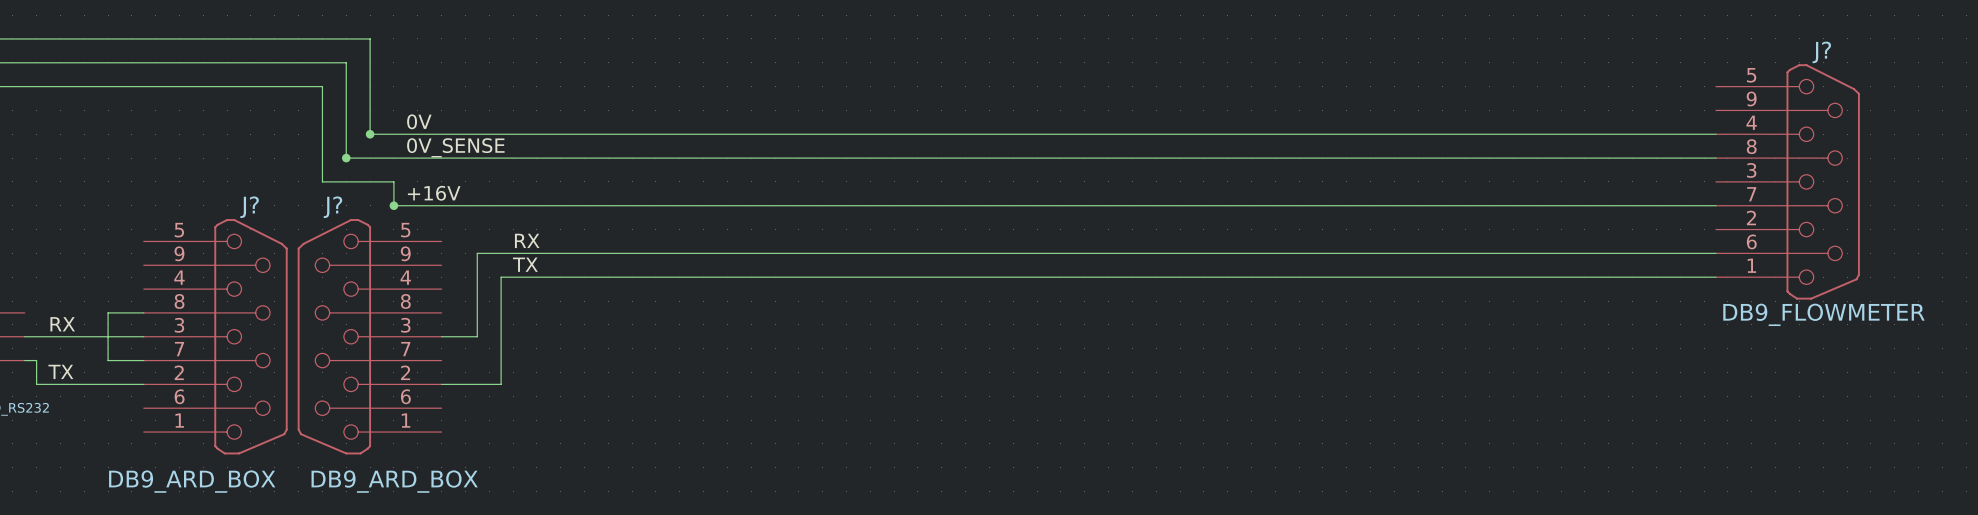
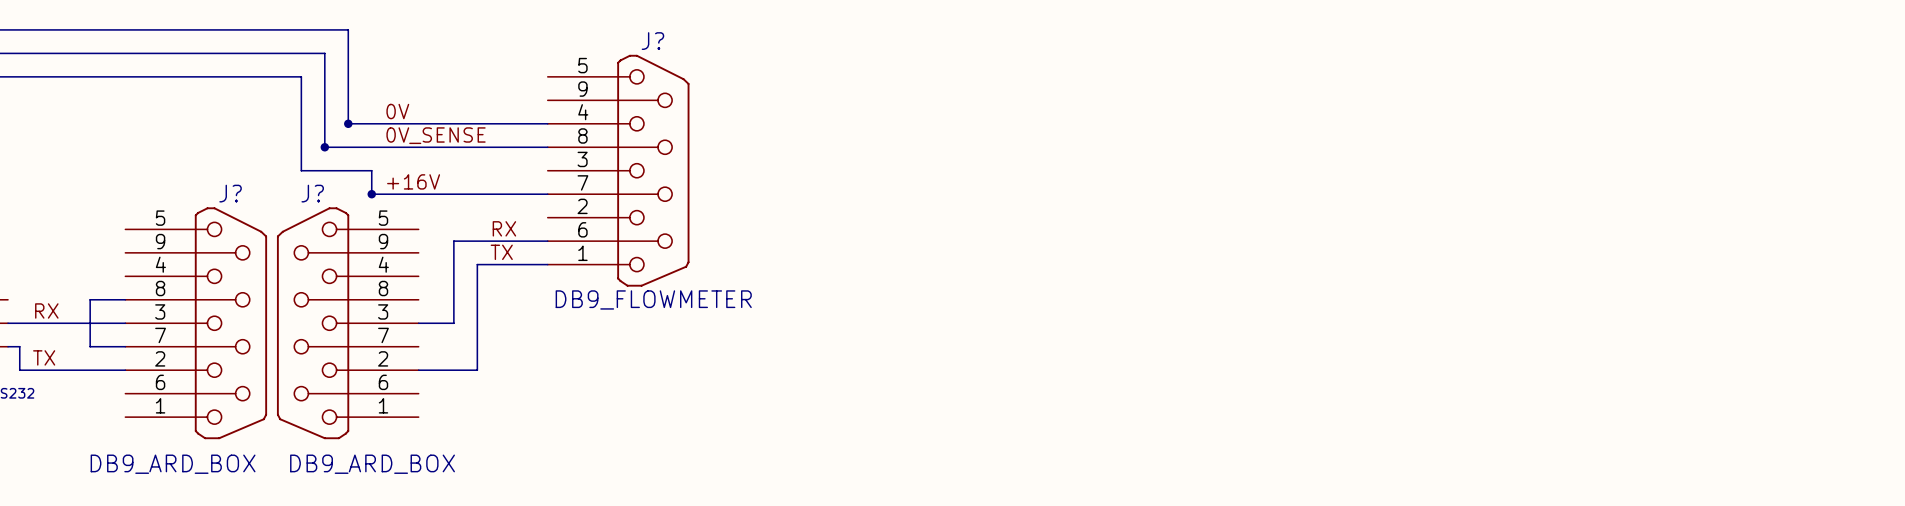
wire: (572, 134) (1715, 134) -> none
wire: (572, 158) (1715, 158) -> none
J?: none -> DB9_FLOWMETER (618, 170)
J?: DB9_FLOWMETER (1787, 181) -> none
wire: (572, 205) (1715, 205) -> none
wire: (572, 253) (1715, 253) -> none
wire: (572, 277) (1715, 277) -> none

